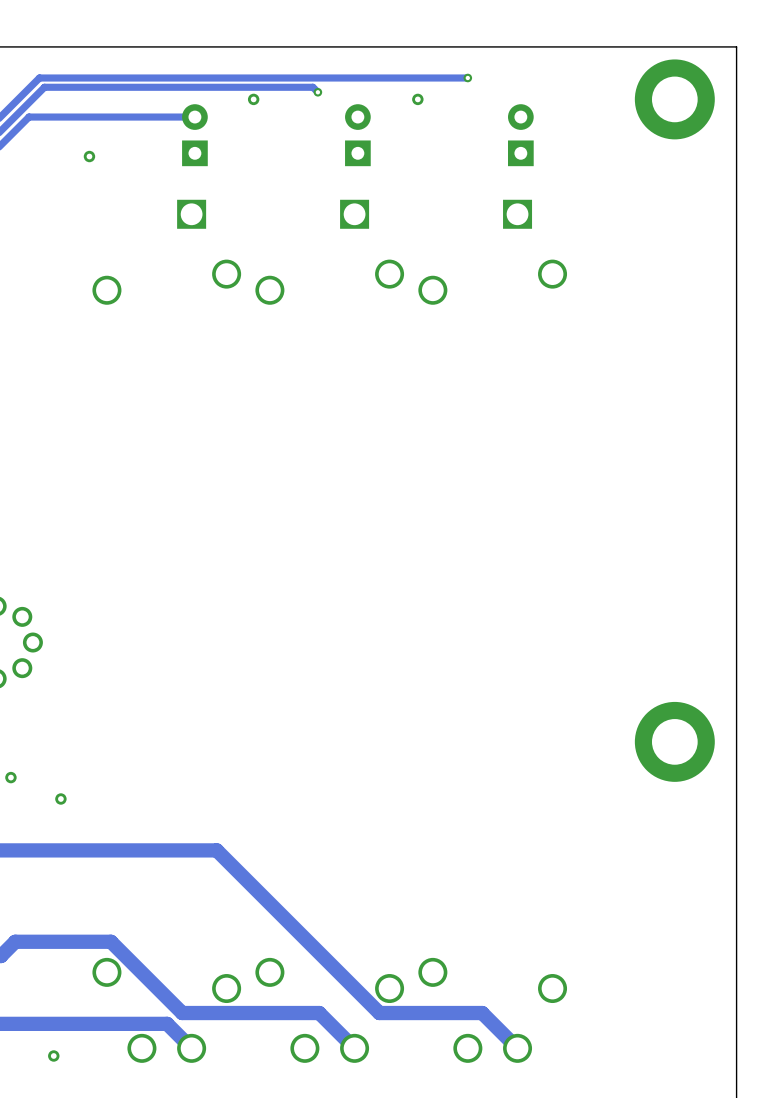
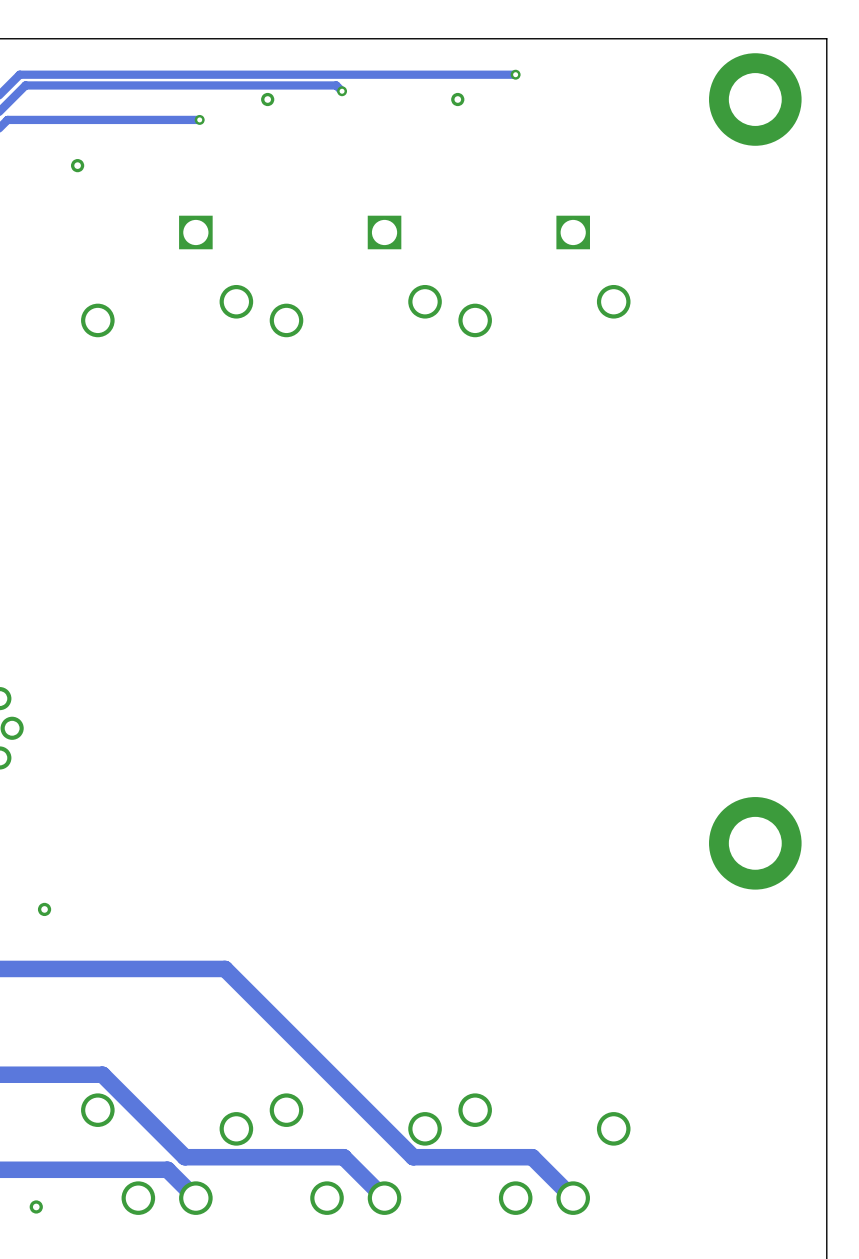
via: none -> (199, 119)
part: (194, 135) -> none
part: (357, 135) -> none
part: (520, 135) -> none

